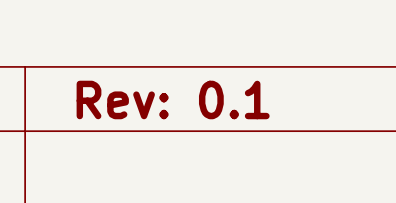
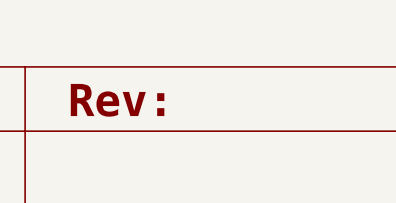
title block: Rev: 0.1 (173, 99) -> Rev: (117, 100)

